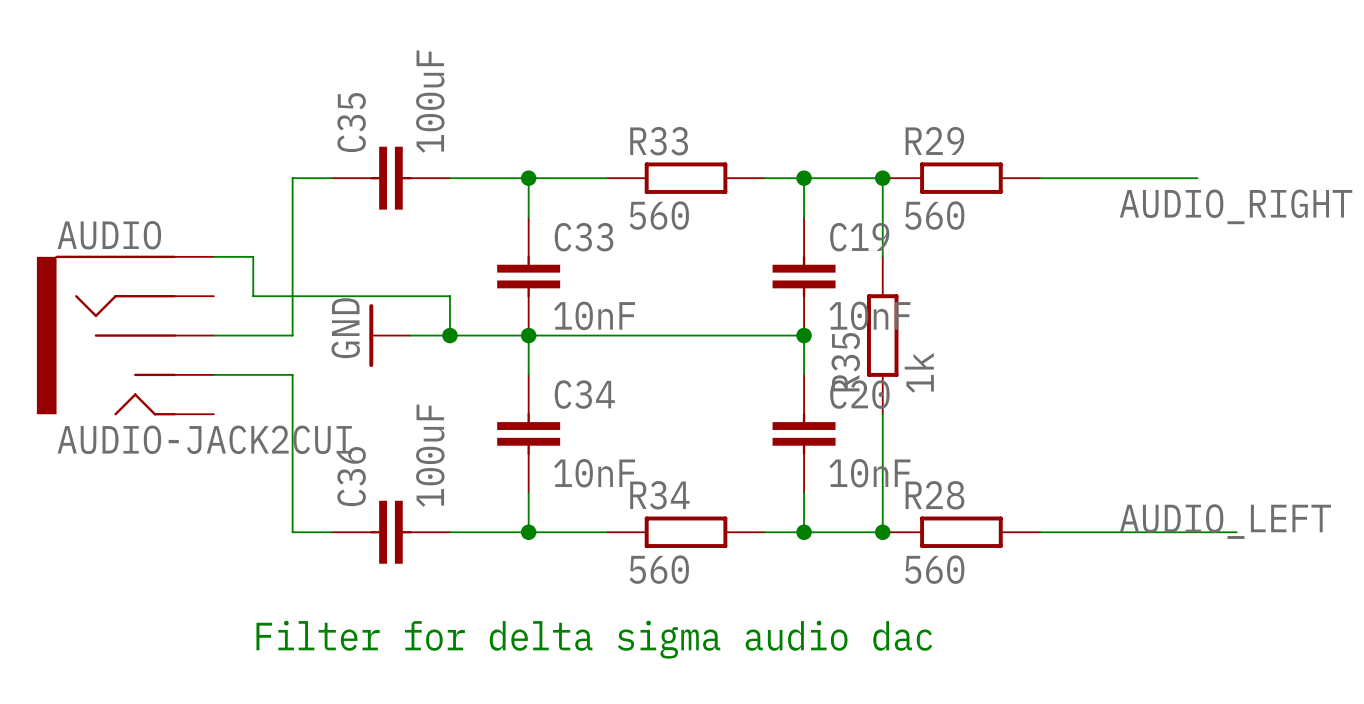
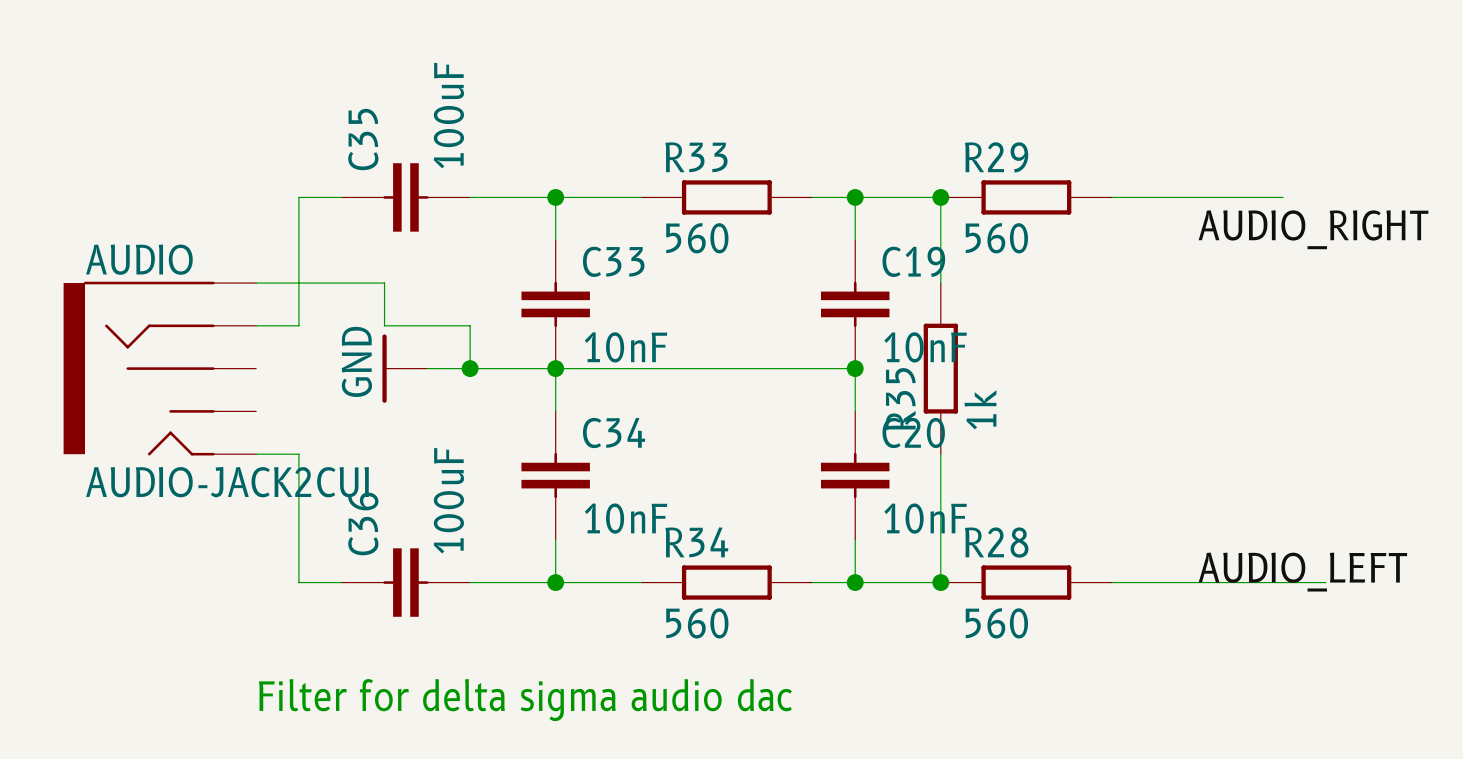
wire: (213, 256) (253, 256) (253, 296) -> none
wire: (371, 296) (292, 296) (292, 335) (213, 335) -> (384, 325) (384, 283) (256, 283)
AUDIO position: (125, 335) -> (159, 368)
wire: (213, 374) (292, 374) (292, 414) -> (256, 454) (298, 454)

